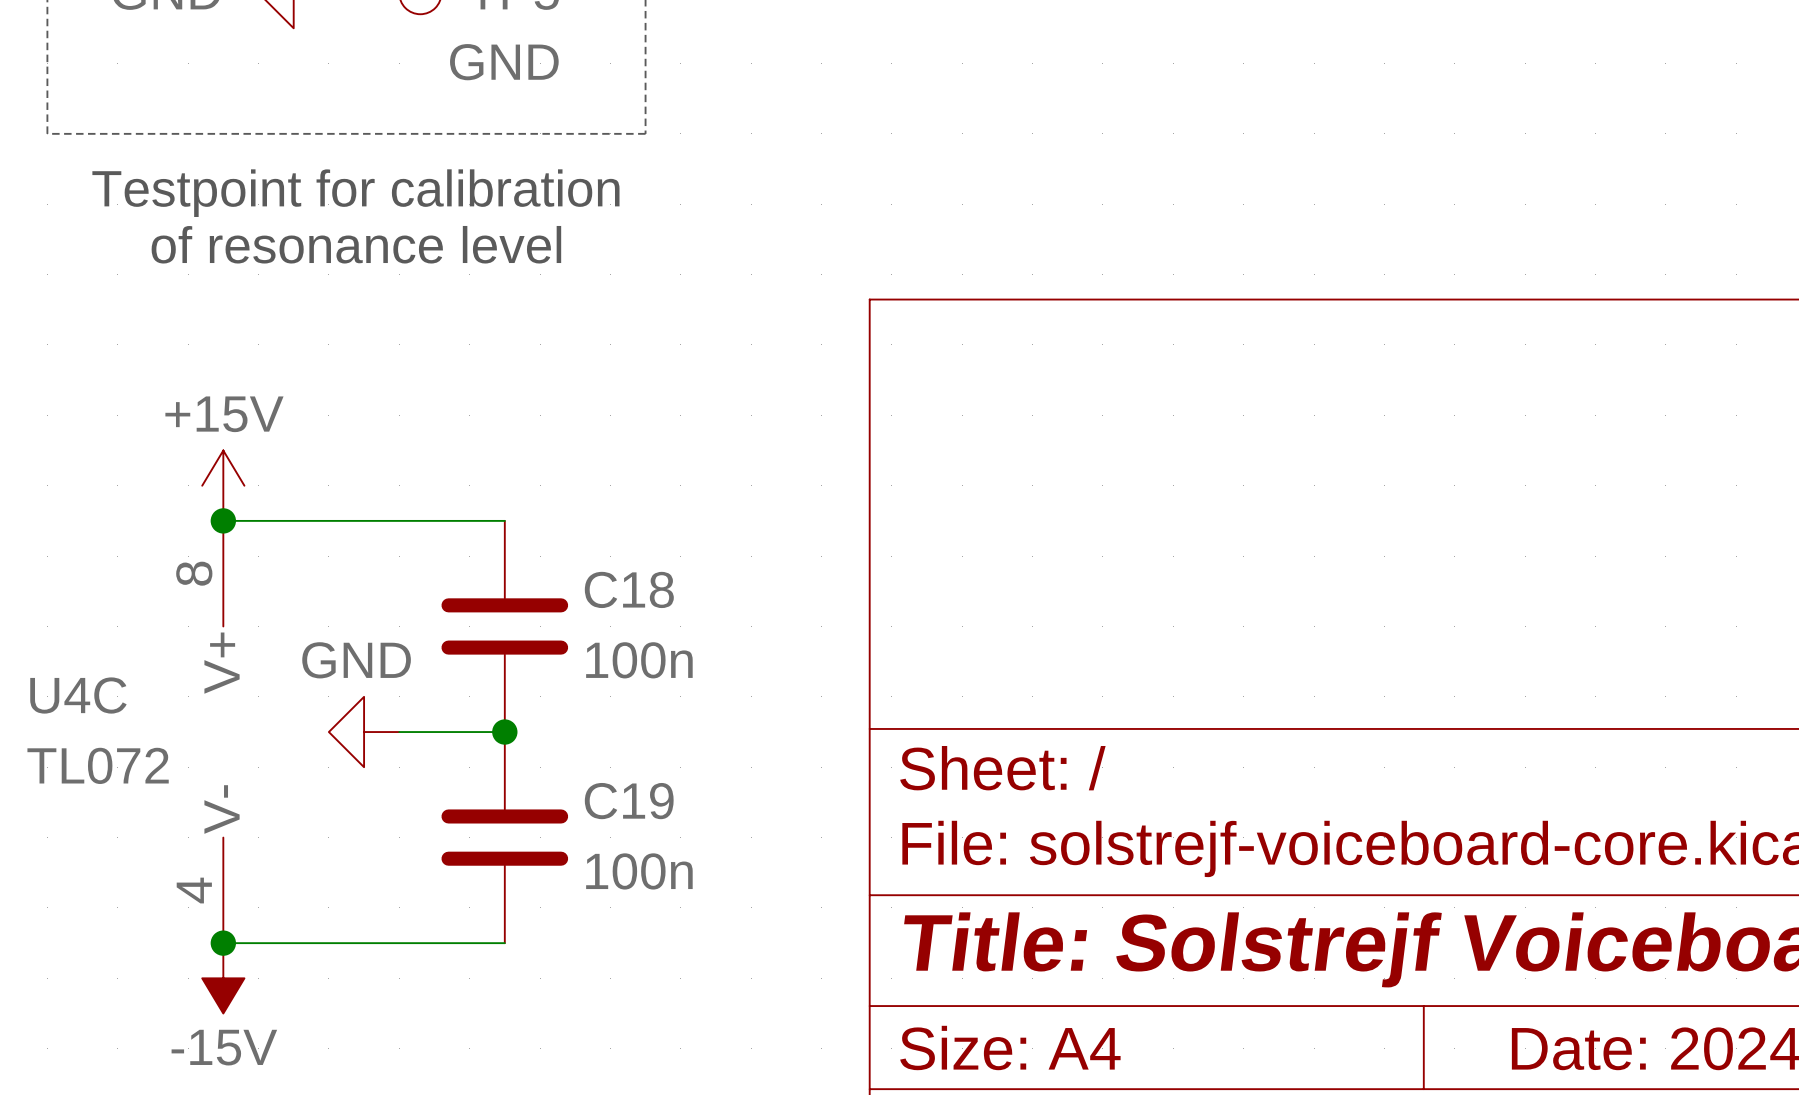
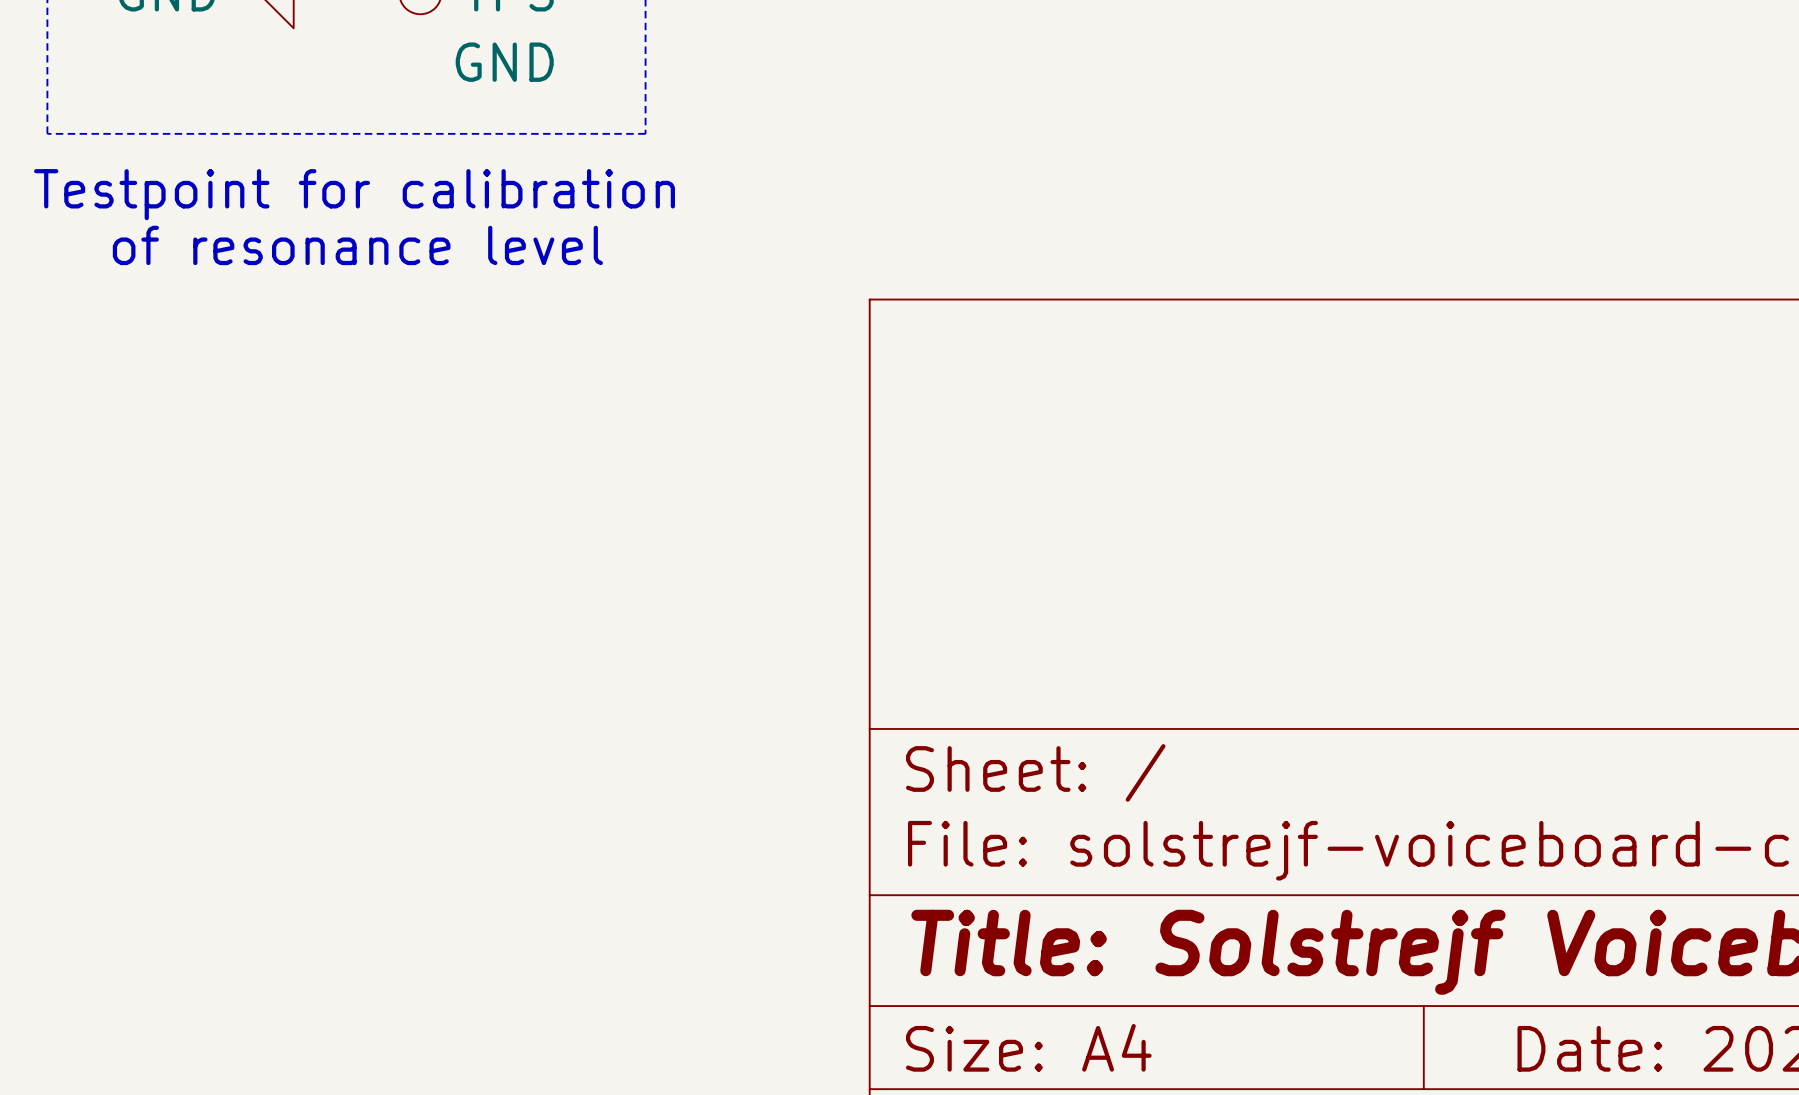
power symbol: +15V (223, 485) -> none
wire: (223, 520) (504, 520) -> none
junction: (223, 520) -> none
C18: 100n (504, 626) -> none
U4C: TL072 (223, 732) -> none
power symbol: GND (364, 732) -> none
wire: (399, 732) (504, 732) -> none
junction: (504, 732) -> none
C19: 100n (504, 837) -> none
wire: (223, 943) (504, 943) -> none
junction: (223, 943) -> none
power symbol: -15V (223, 978) -> none

